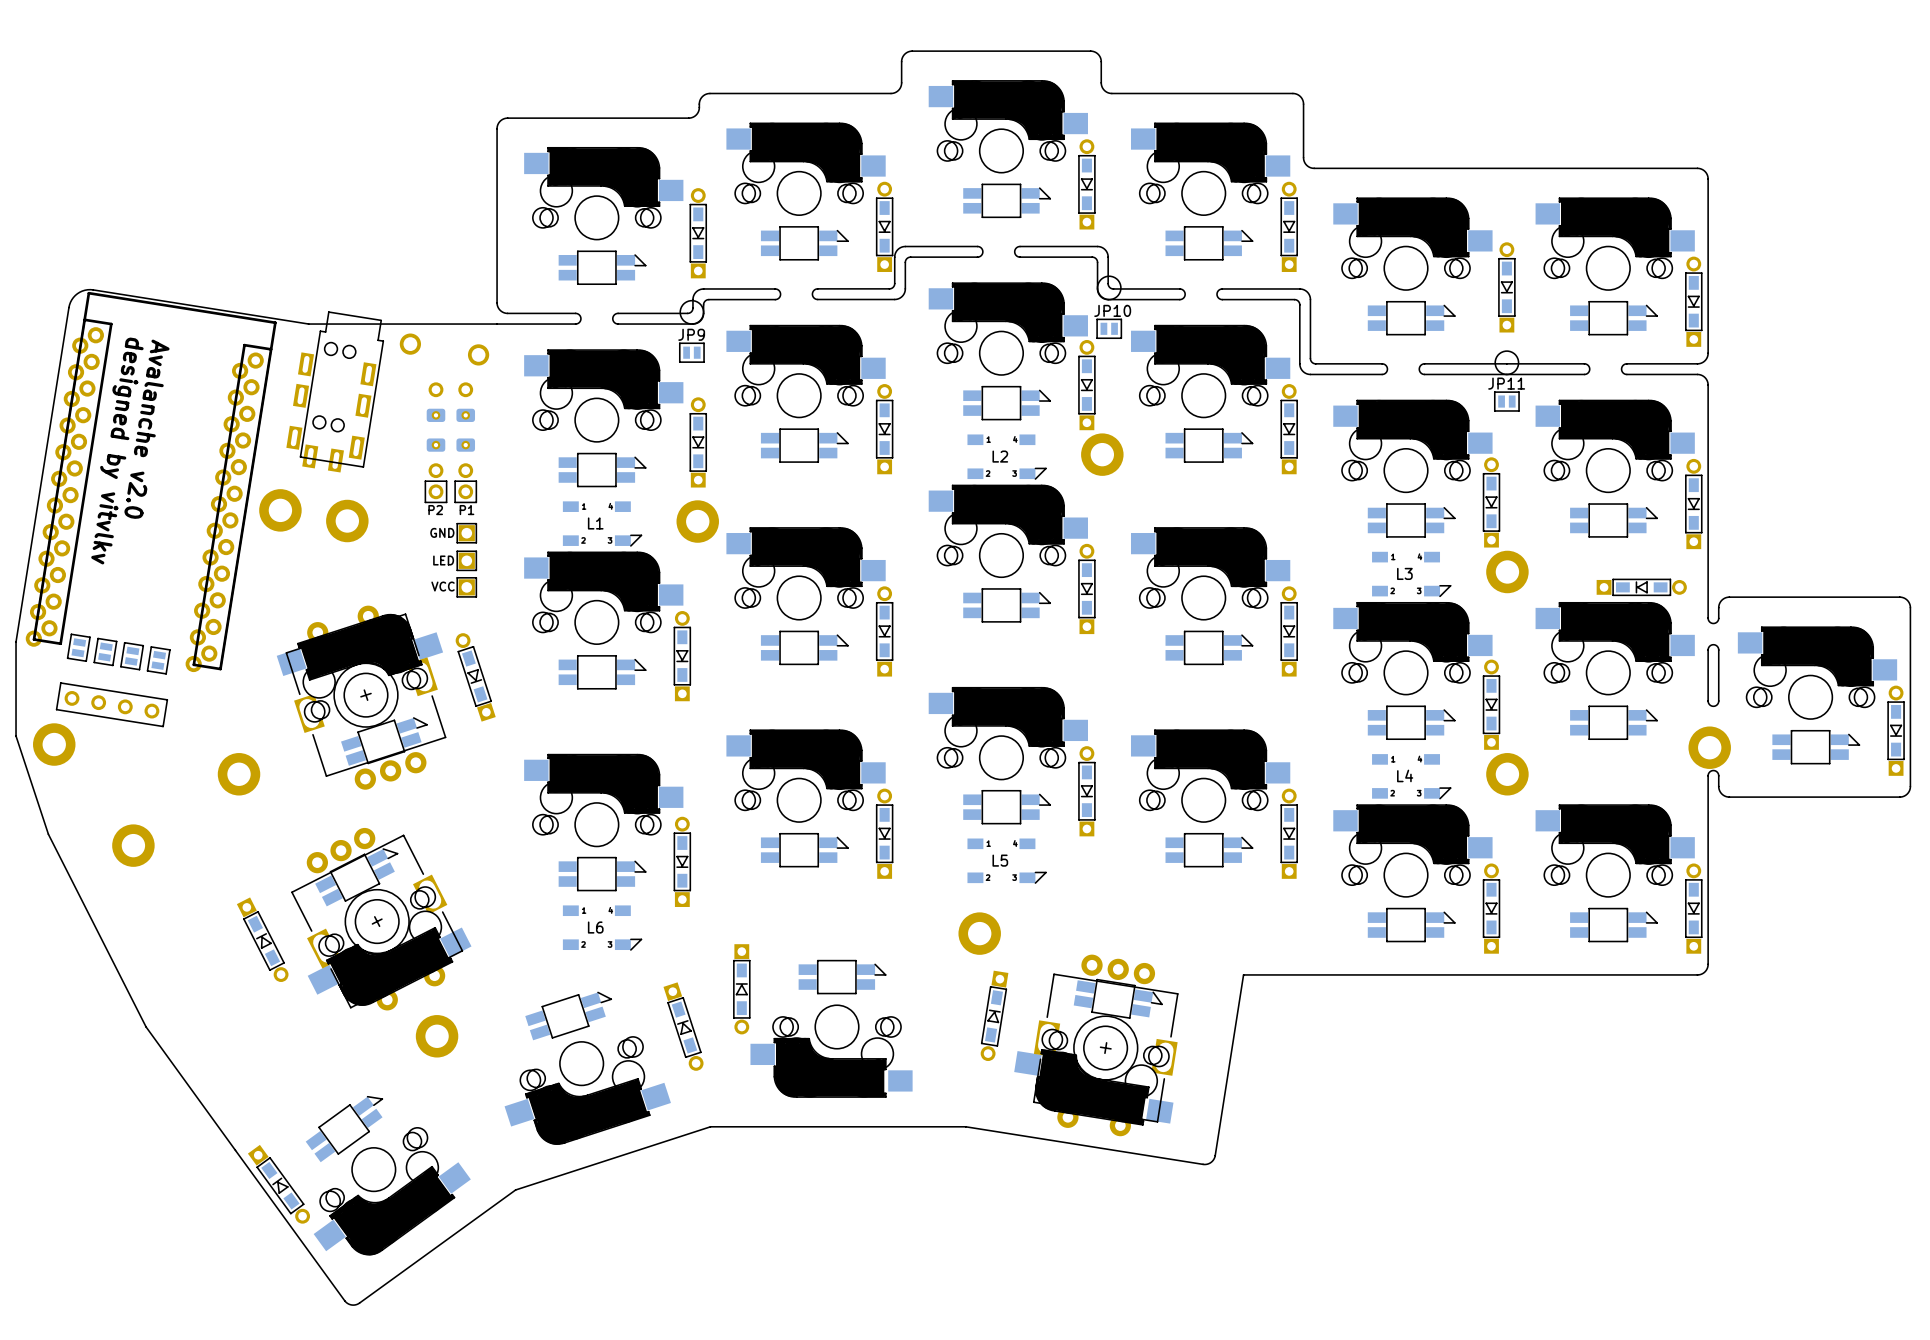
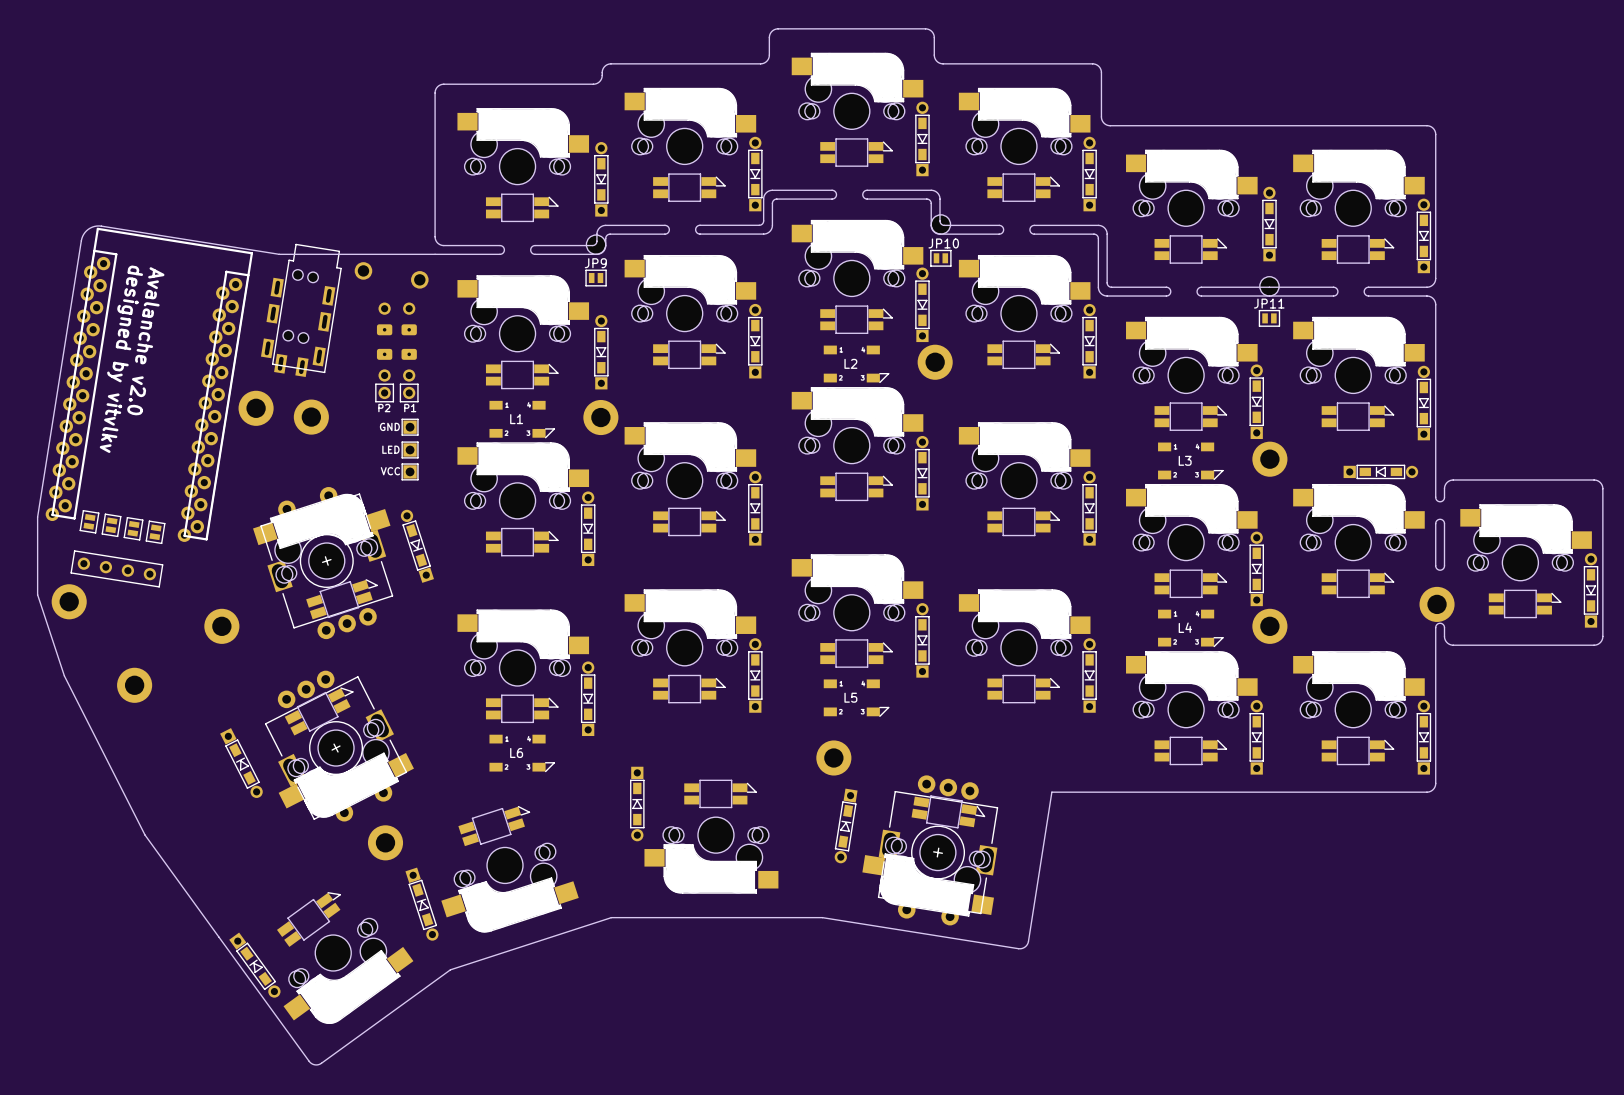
part position: (683, 1026) -> (421, 904)

